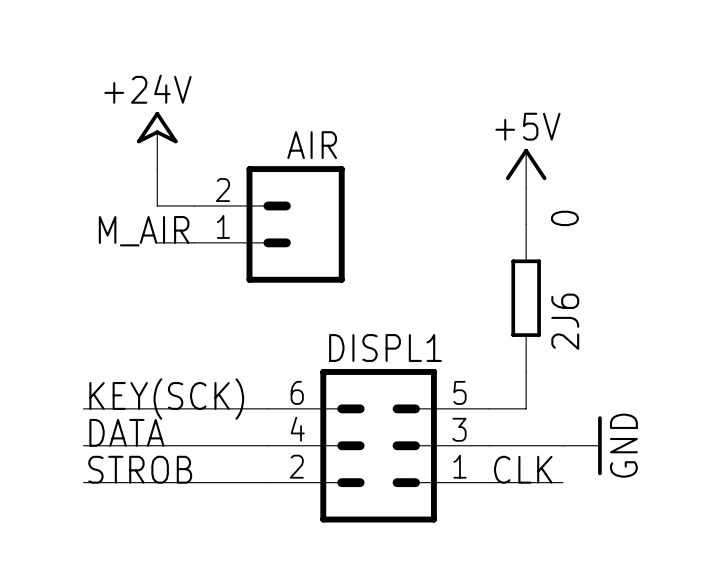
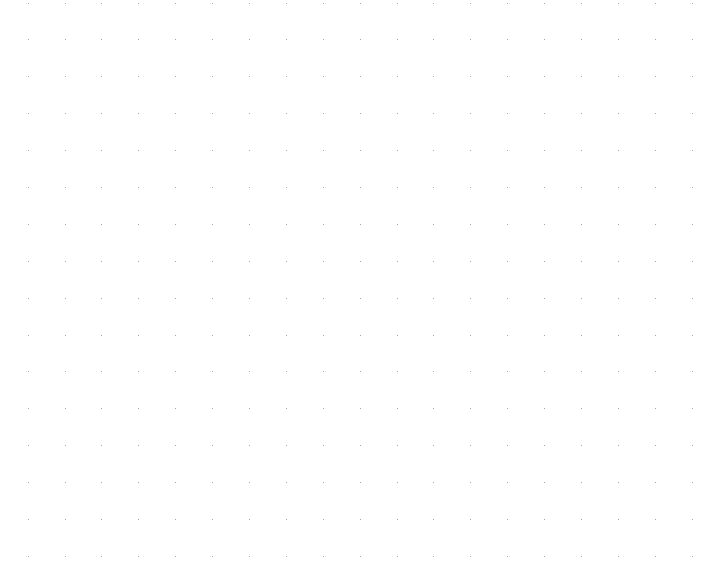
power symbol: +24V (157, 140) -> none
power symbol: +5V (526, 168) -> none
wire: (157, 169) (157, 205) (194, 205) -> none
wire: (526, 187) (526, 224) -> none
AIR: (269, 224) -> none
label: M_AIR (144, 231) -> none
wire: (157, 242) (194, 242) -> none
2J6: 0 (526, 298) -> none
wire: (526, 371) (526, 408) (489, 408) -> none
label: KEY(SCK) (166, 399) -> none
wire: (83, 408) (267, 408) -> none
label: DATA (126, 432) -> none
wire: (83, 445) (267, 445) -> none
DISPL1: (378, 445) -> none
wire: (489, 445) (563, 445) -> none
power symbol: GND (582, 445) -> none
label: STROB (140, 469) -> none
label: CLK (523, 469) -> none
wire: (83, 482) (267, 482) -> none
wire: (489, 482) (563, 482) -> none

